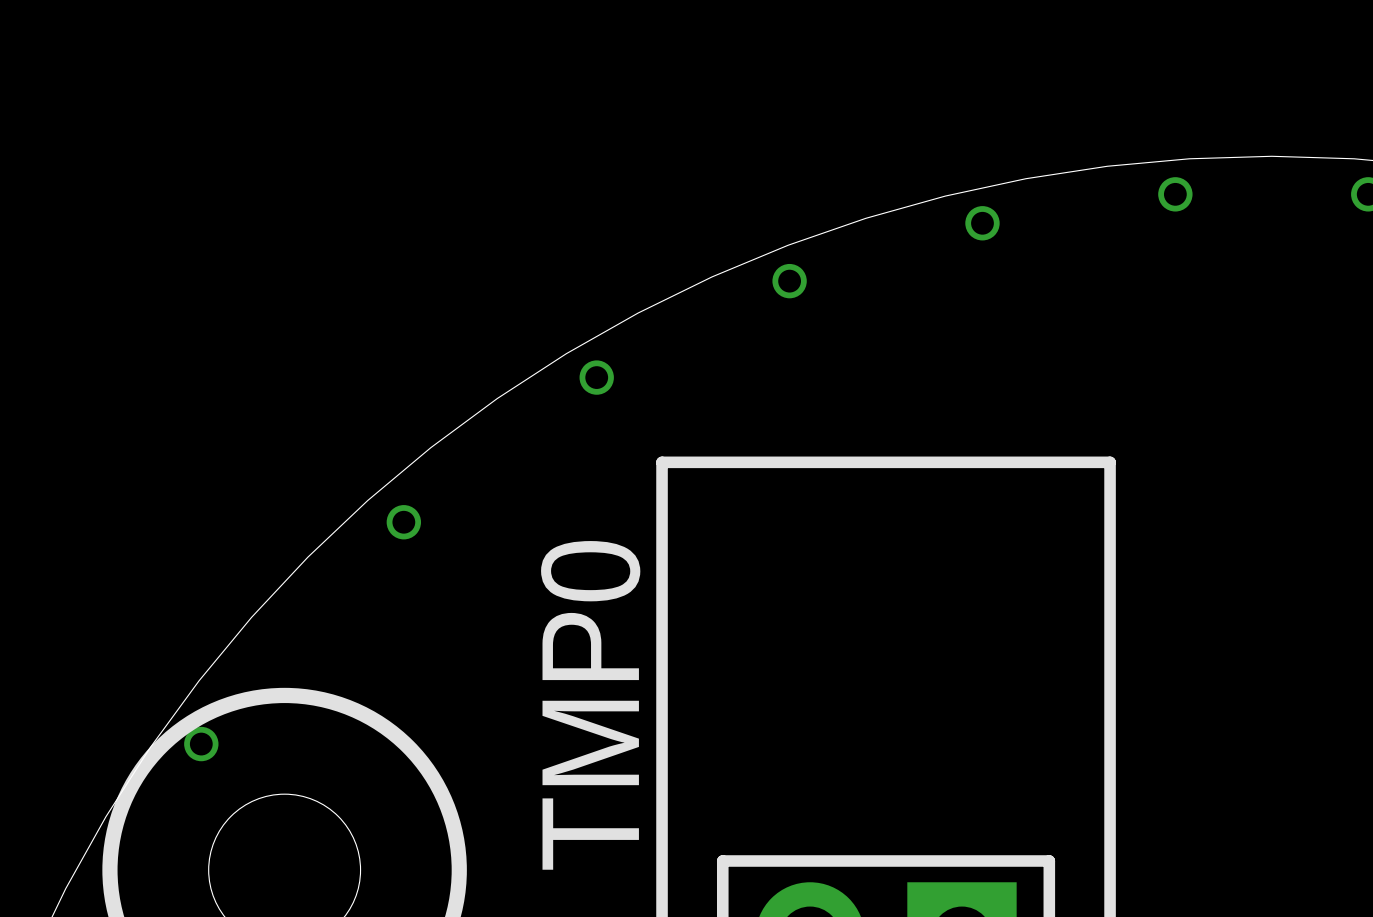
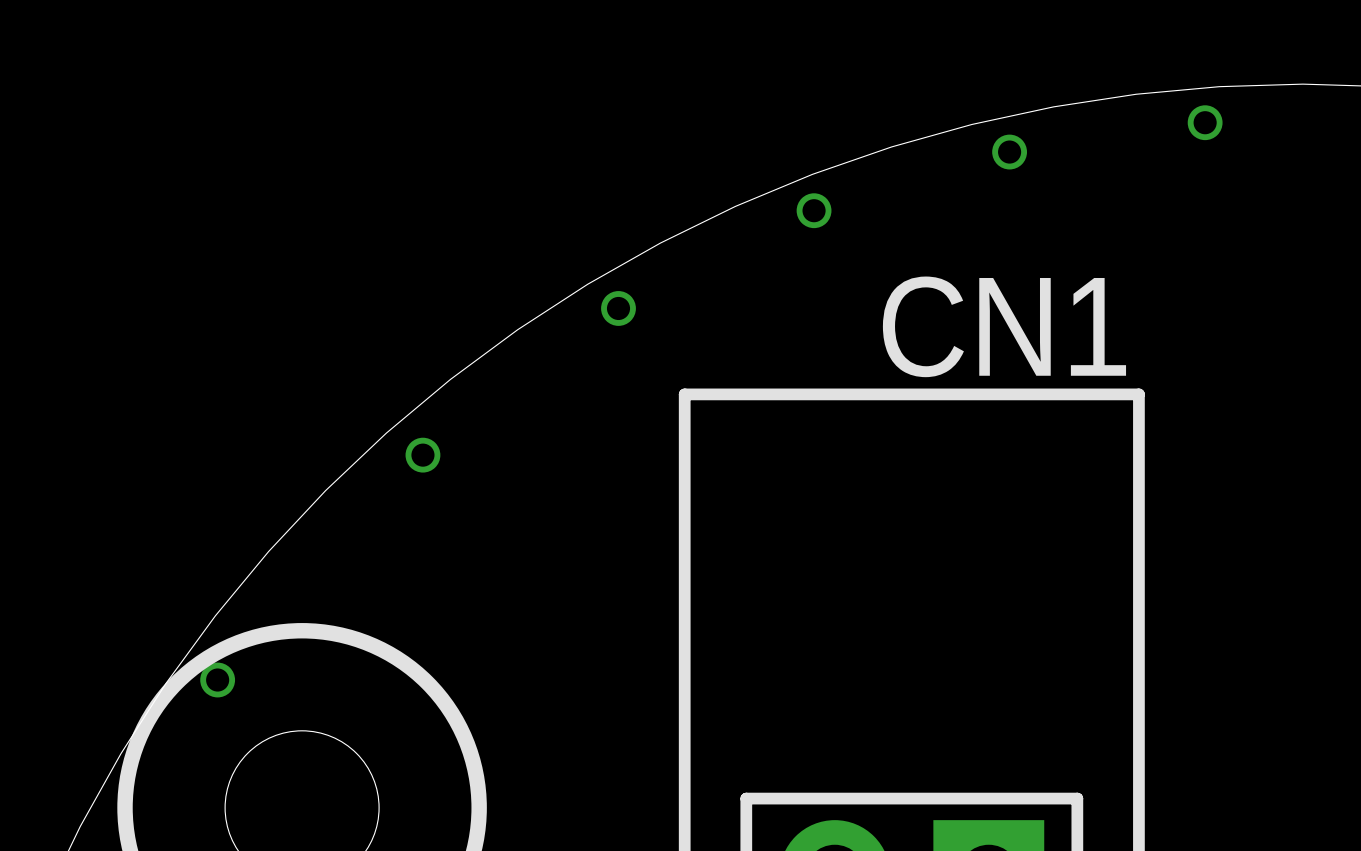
TMP0 name: TMP0 (590, 705) -> CN1 (1004, 326)

